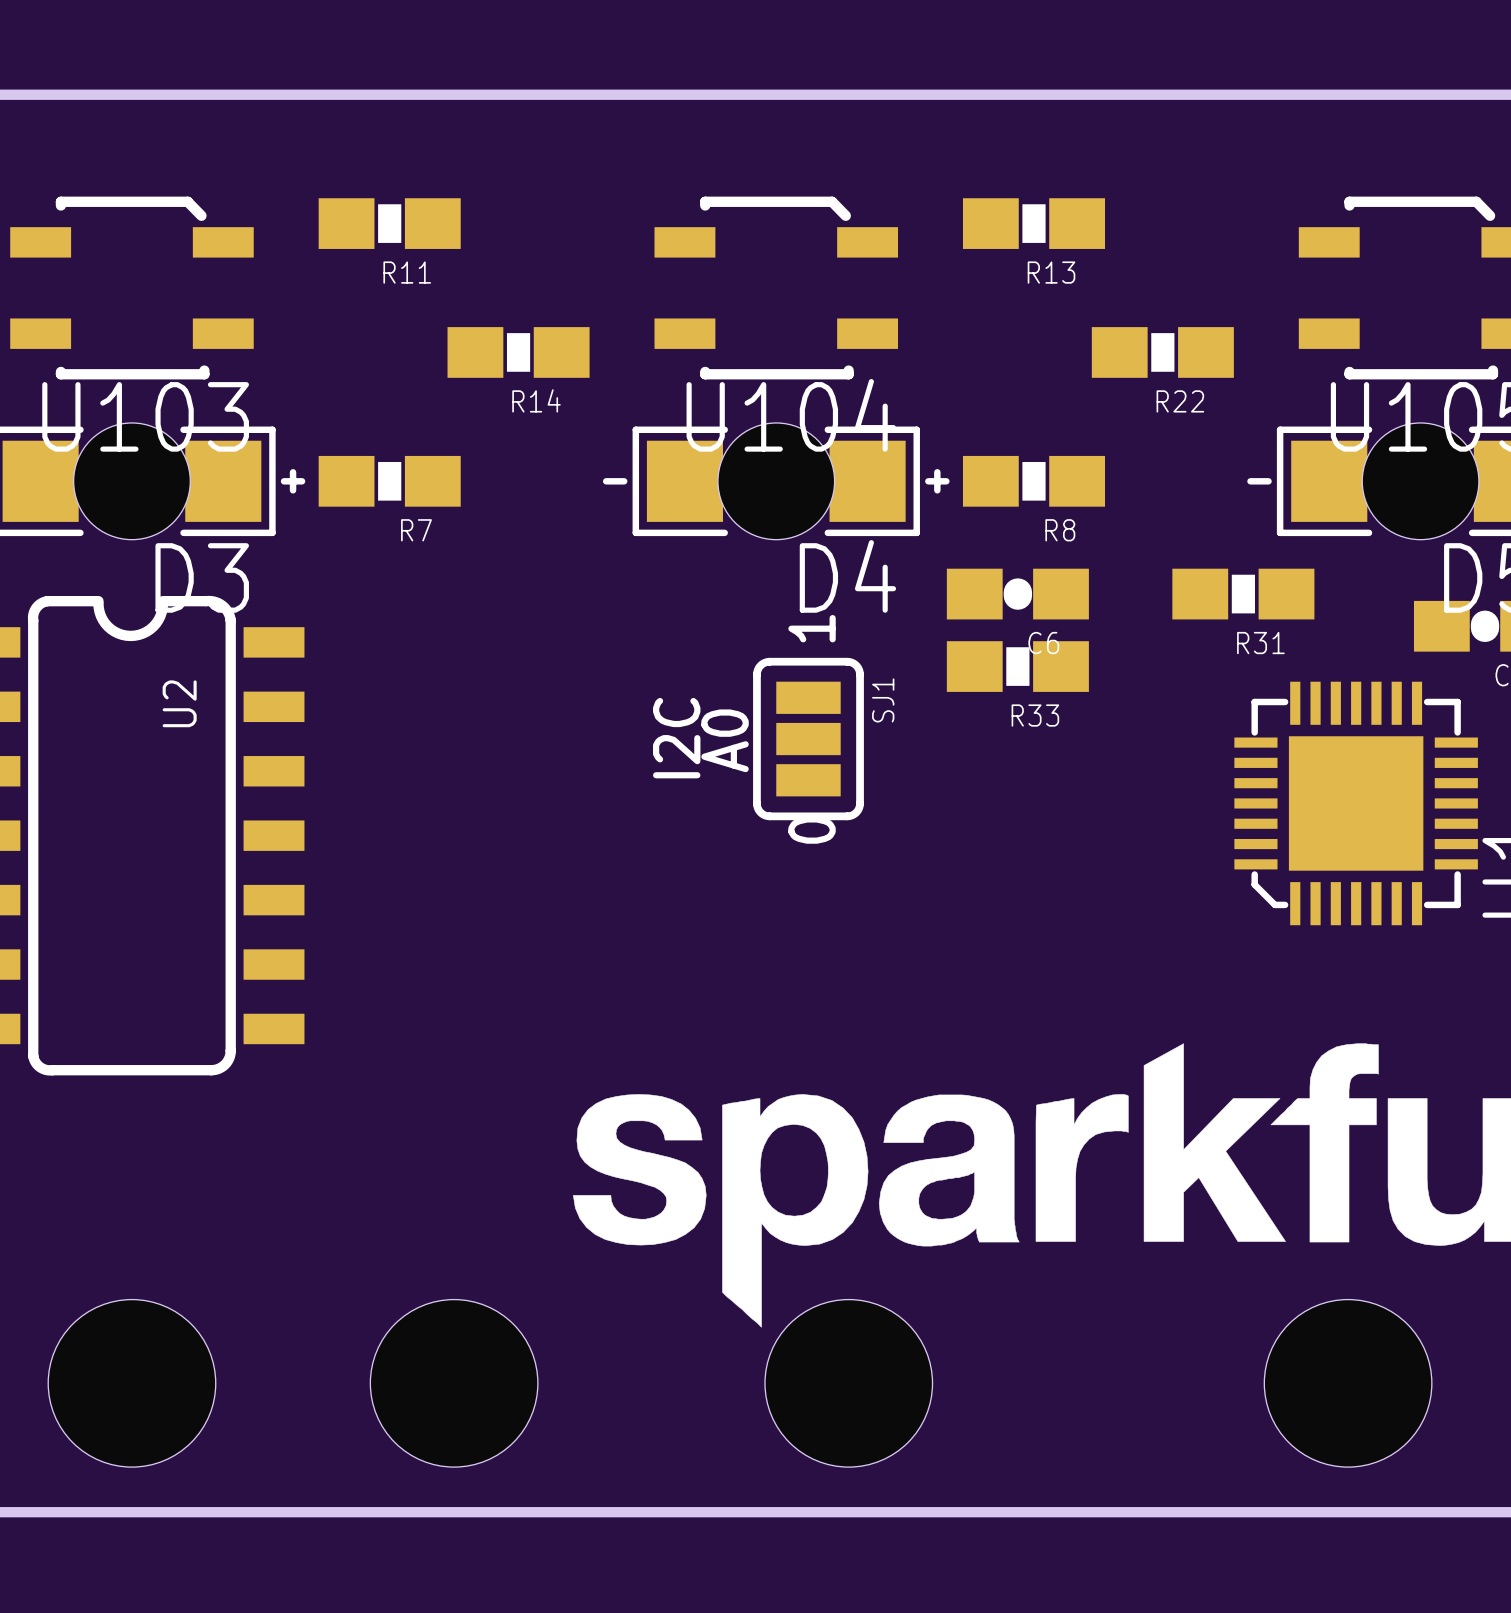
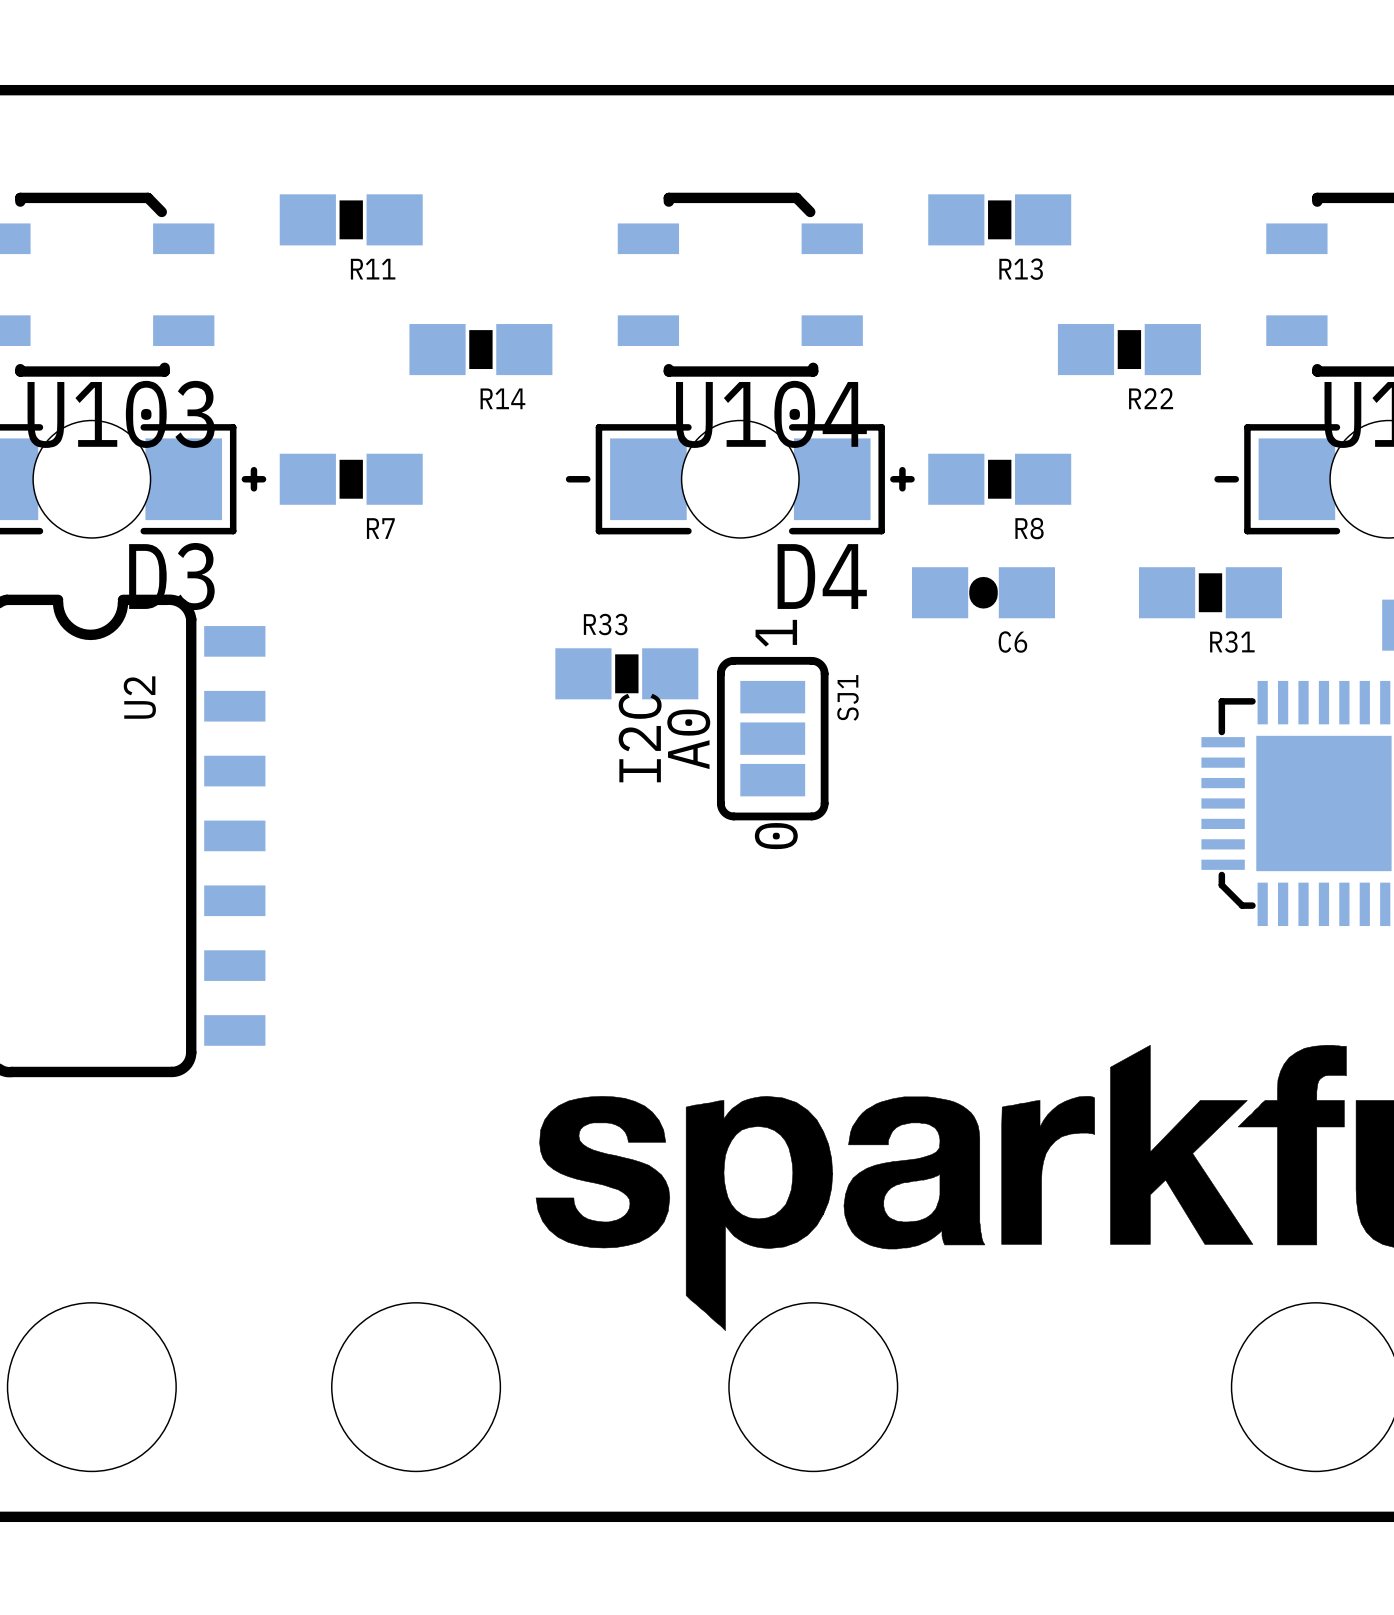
R33 position: (1017, 666) -> (626, 673)
R33 name position: R33 (1035, 715) -> R33 (605, 624)

